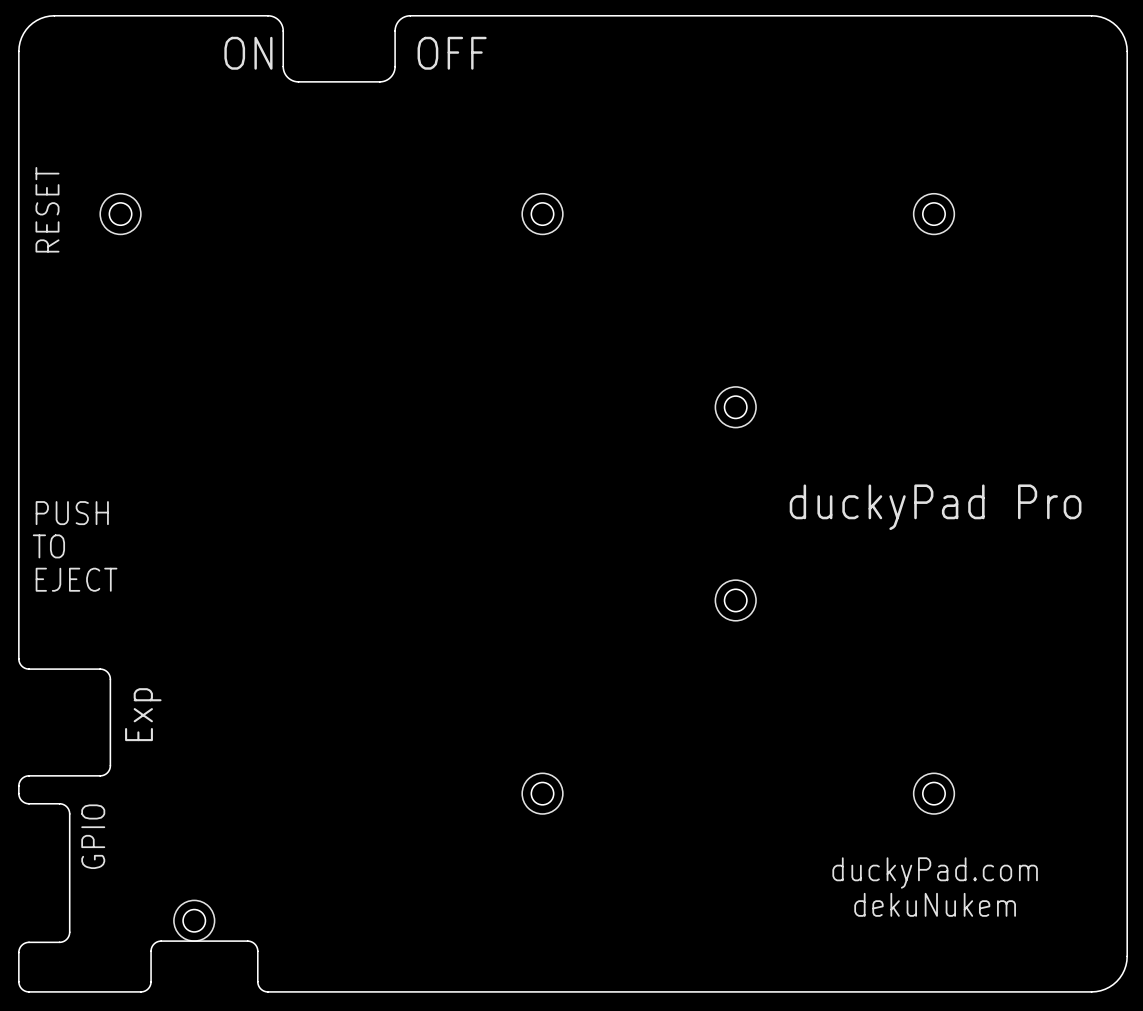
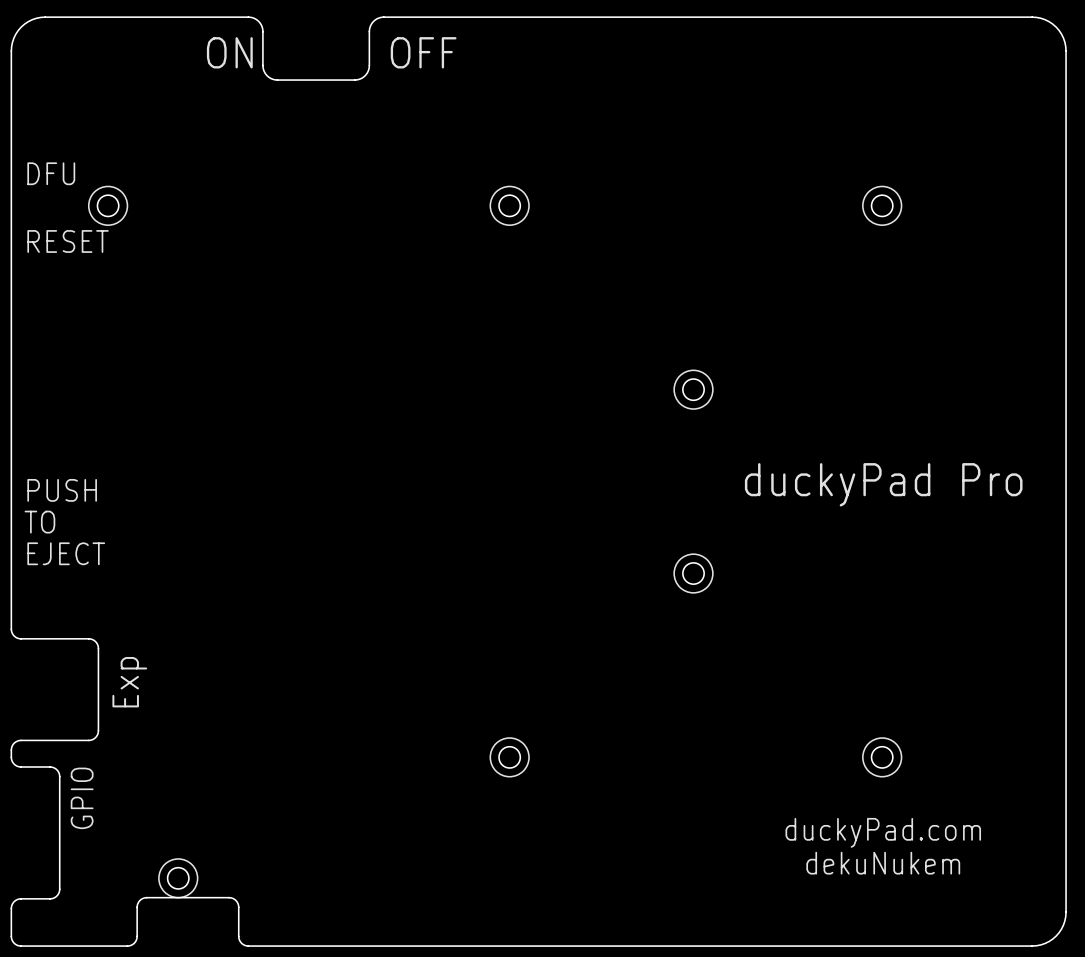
text: none -> DFU (51, 173)
text rotation: 0° (47, 209) -> 90° clockwise (68, 241)

